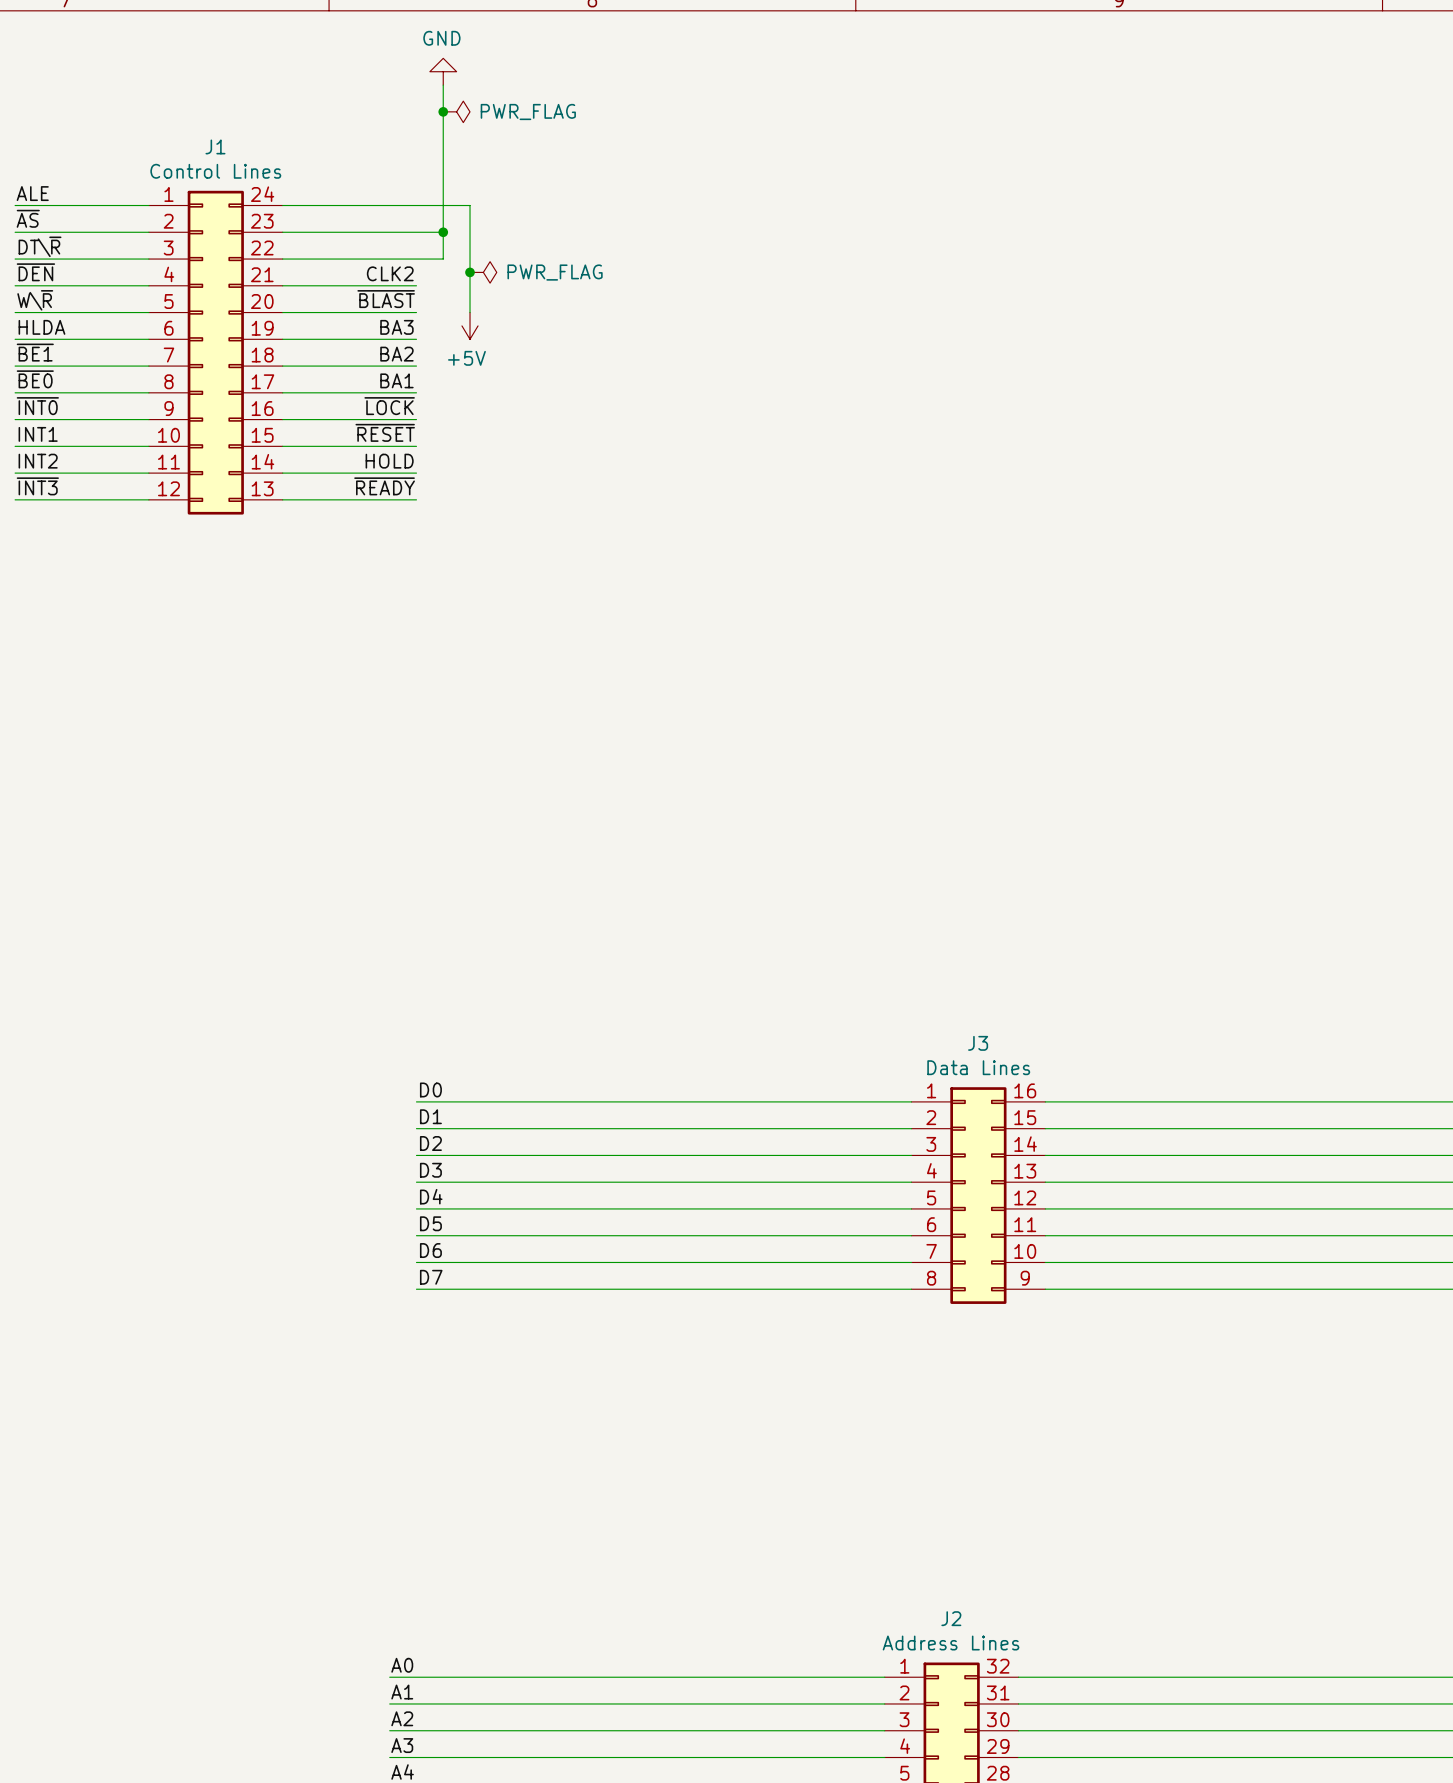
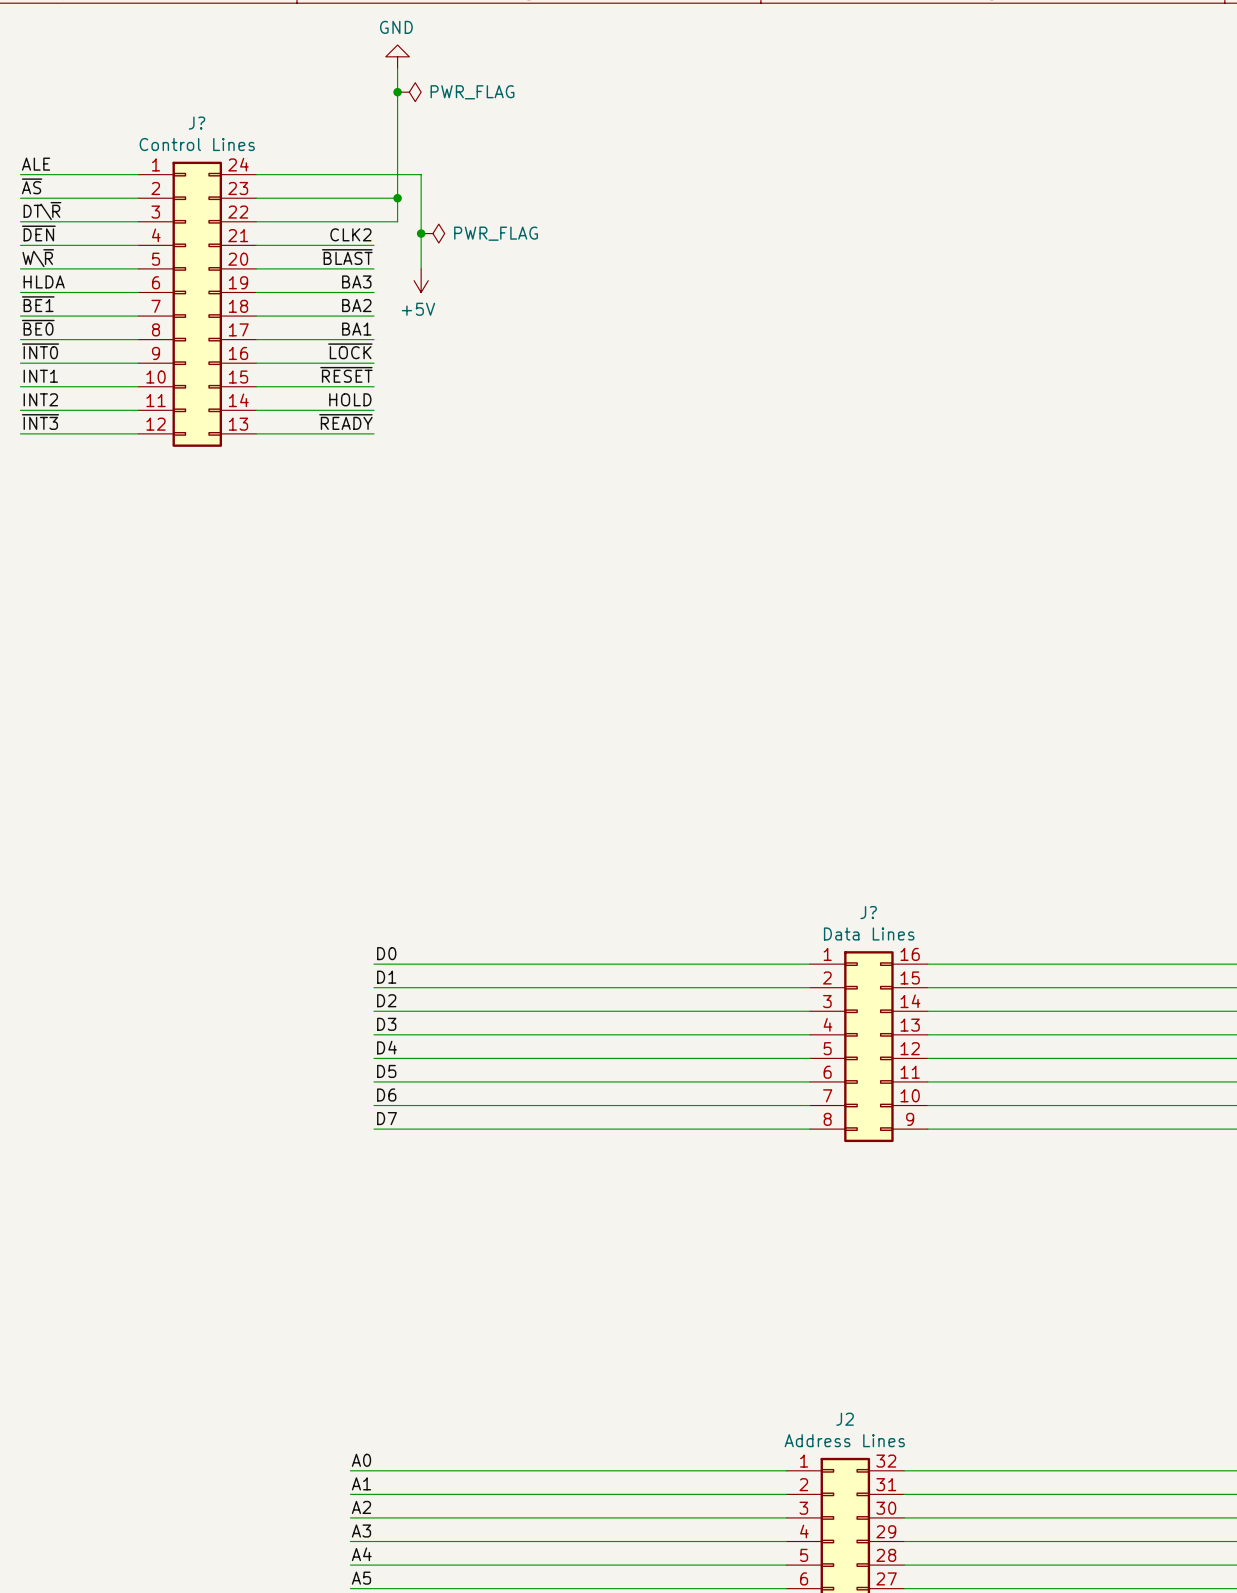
J1 name: J1 (215, 146) -> J? (196, 123)
J3 name: J3 (978, 1043) -> J? (868, 912)

